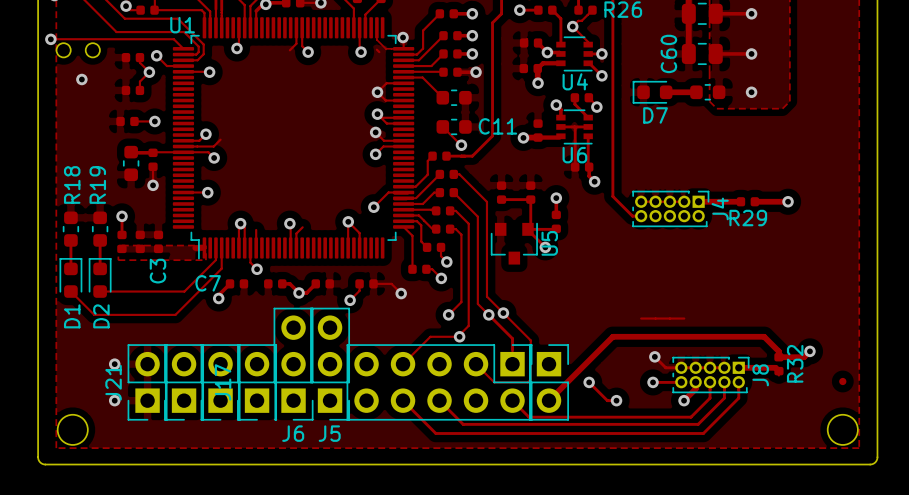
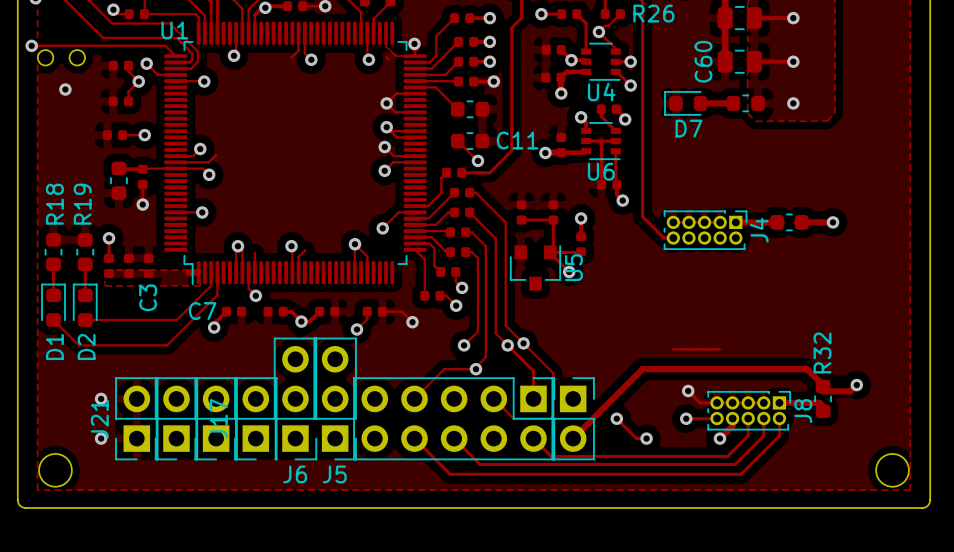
R29: (747, 201) -> none
part: none -> (789, 222)
R32 footprint: [774, 352, 784, 376] -> [814, 379, 832, 419]
R32 name position: R32 (795, 363) -> R32 (822, 352)
part: (842, 381) -> none

